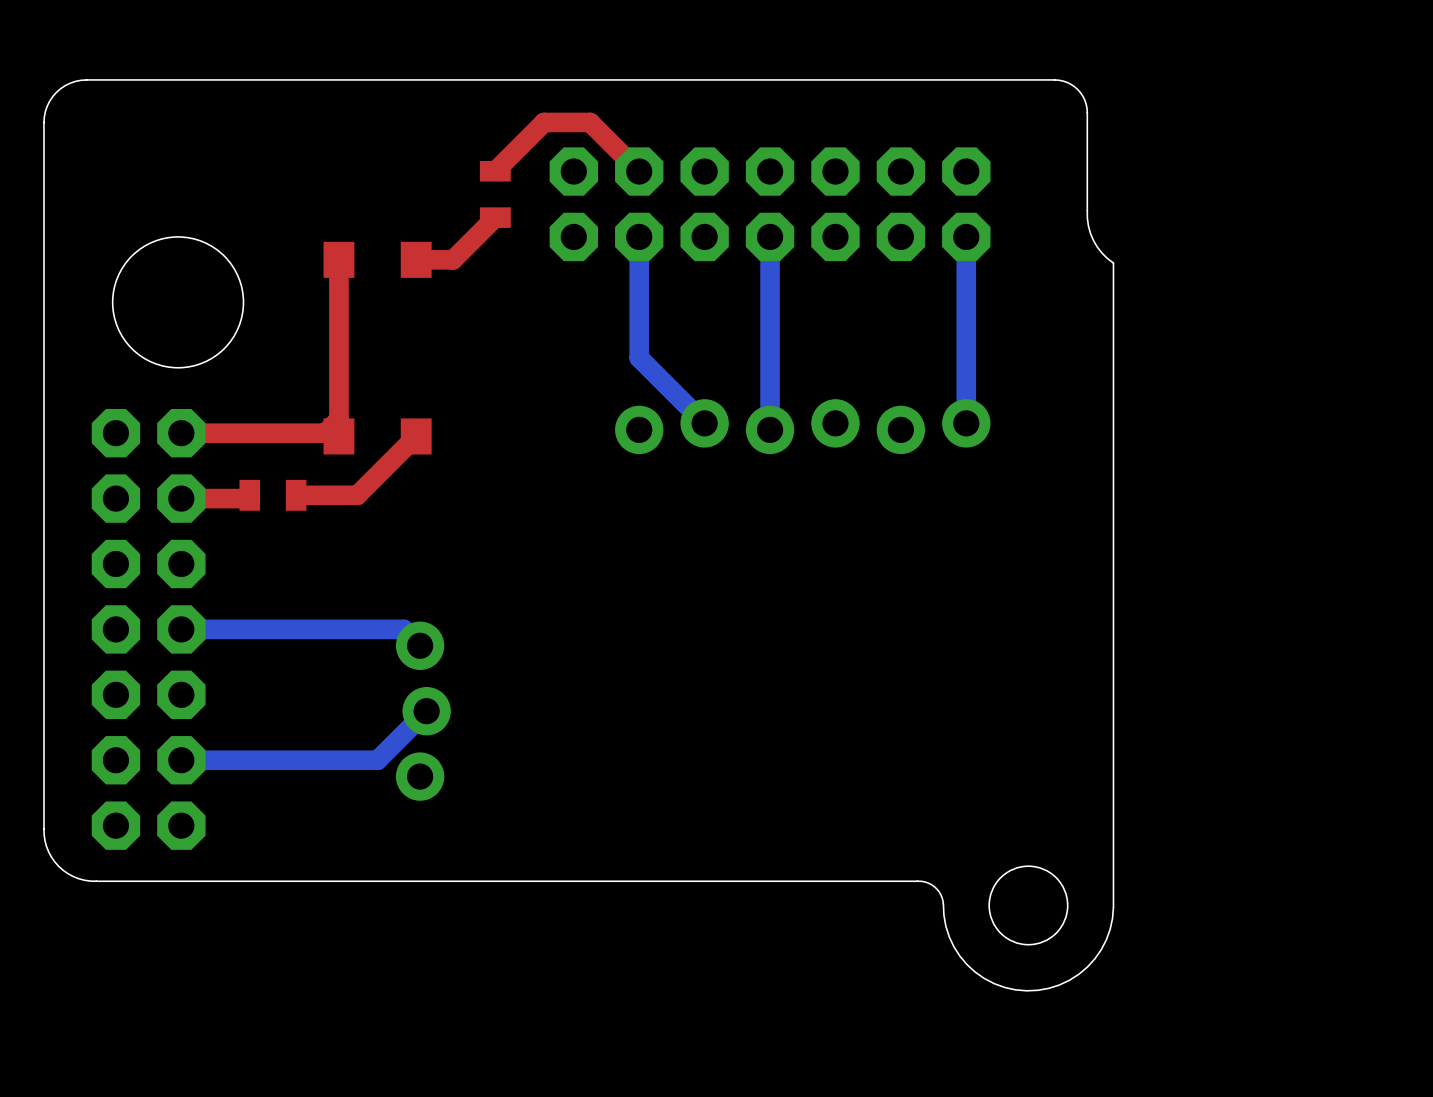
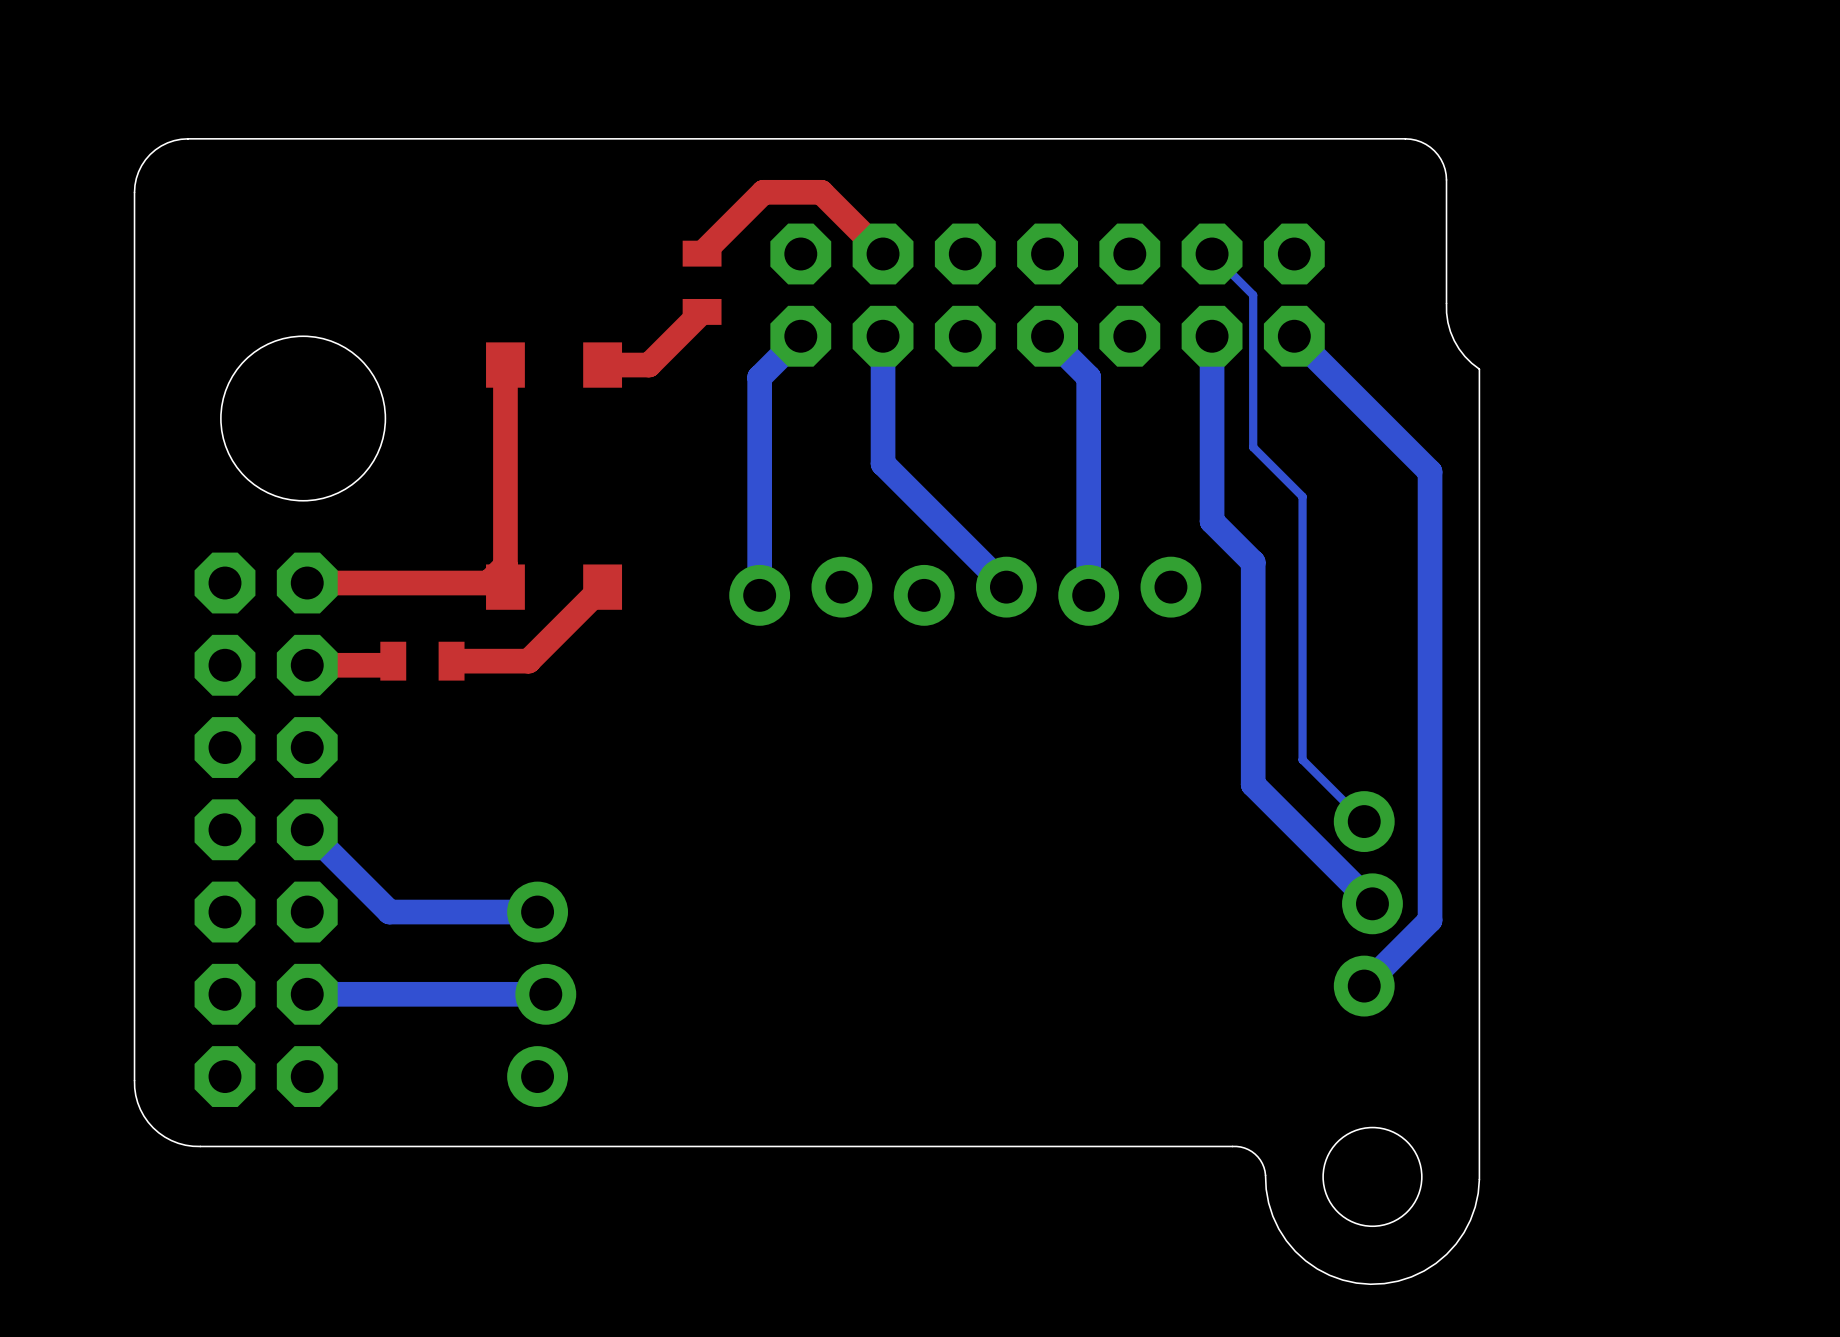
bottom track: none -> (1212, 254) (1253, 295) (1253, 447) (1302, 496) (1302, 759) (1364, 821)
bottom track: none -> (800, 336) (759, 377) (759, 595)
bottom track: (770, 236) (770, 429) -> (1047, 336) (1088, 377) (1088, 595)
bottom track: none -> (1212, 336) (1212, 521) (1253, 562) (1253, 784) (1372, 903)
bottom track: (966, 236) (966, 423) -> (1294, 336) (1430, 471) (1430, 920) (1364, 986)
bottom track: (639, 338) (639, 357) (704, 423) -> (883, 463) (1006, 587)
part position: (802, 426) -> (965, 591)
bottom track: (181, 629) (403, 629) (420, 645) -> (307, 829) (389, 912) (537, 912)
part: none -> (1368, 903)
part position: (423, 711) -> (541, 994)
bottom track: (426, 711) (377, 760) (371, 760) -> none

